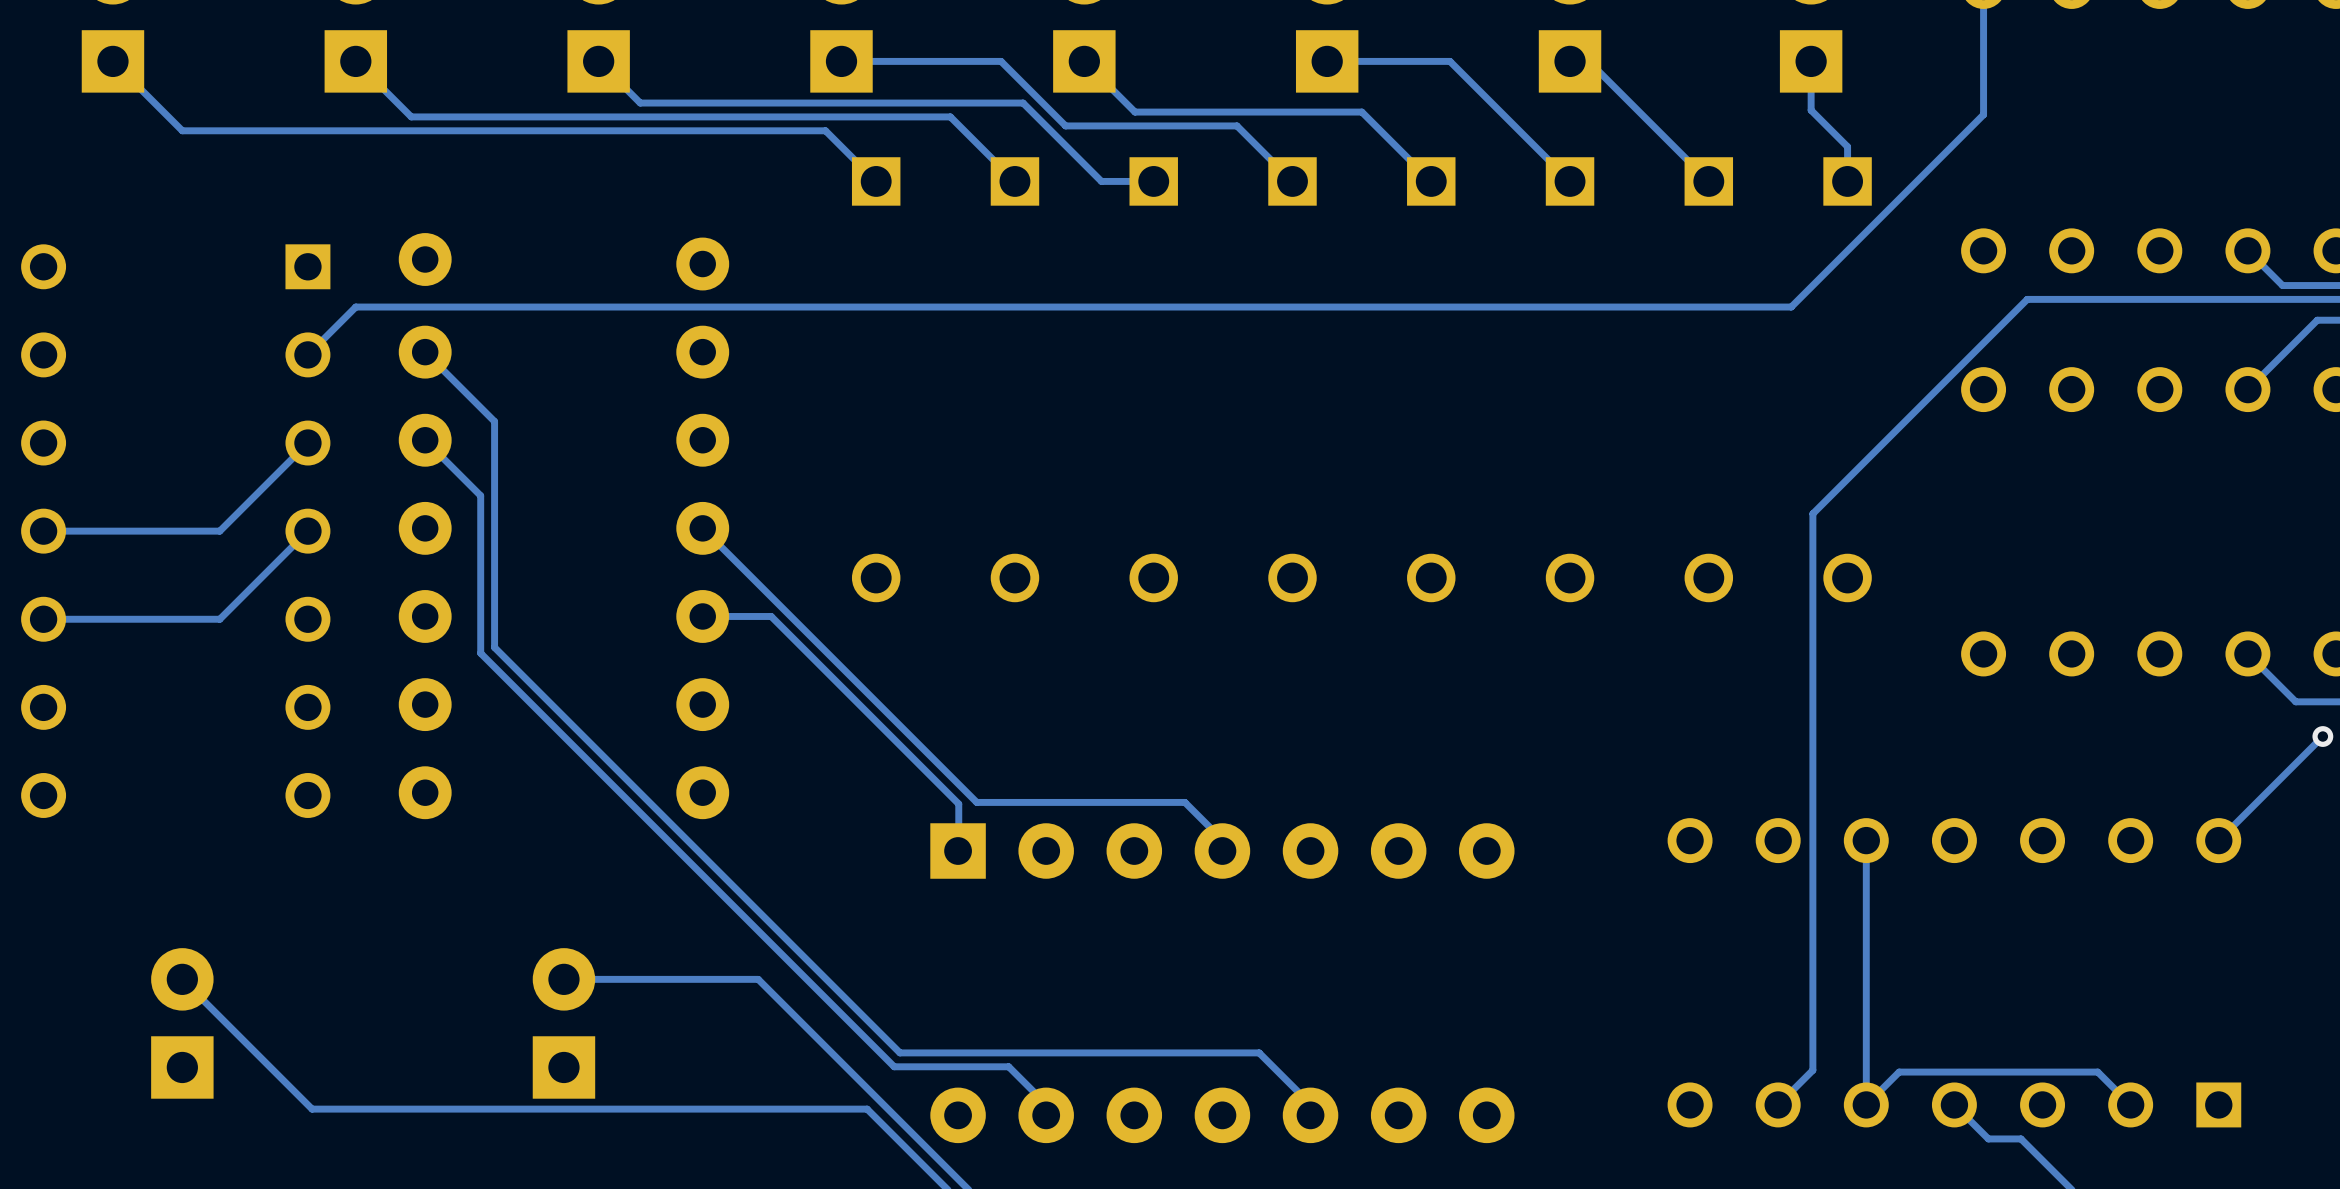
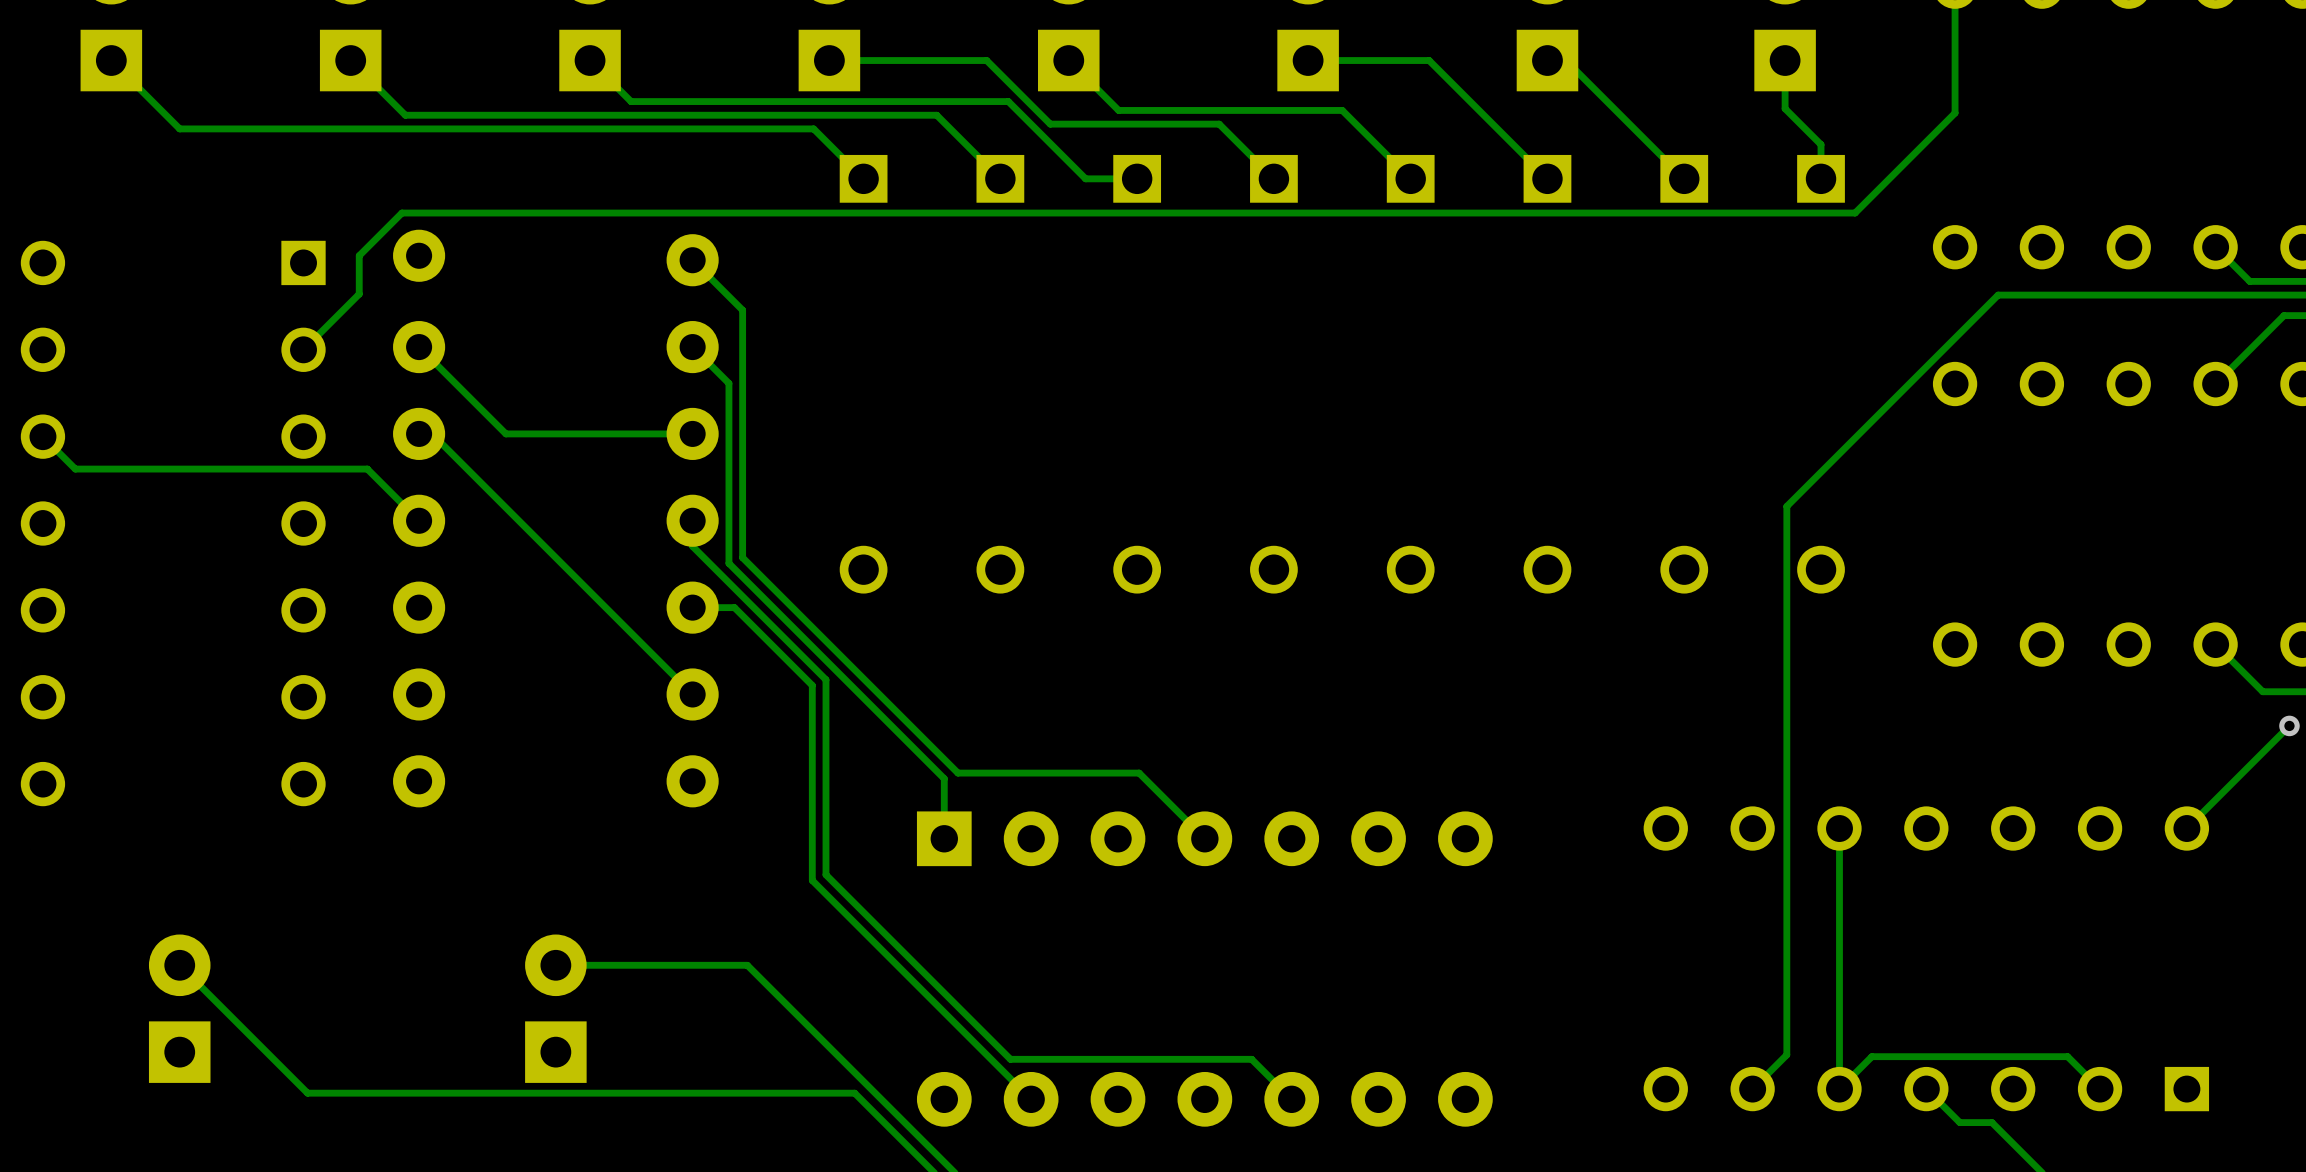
track: (1882, 216) (1791, 307) (355, 307) -> (1855, 213) (401, 213) (359, 255) (359, 294) (350, 302)
track: none -> (692, 260) (742, 310) (742, 557) (957, 773) (1139, 773) (1204, 838)
track: none -> (692, 347) (728, 383) (728, 563) (944, 778) (944, 838)
track: (494, 421) (494, 647) (899, 1052) (1259, 1052) (1311, 1104) -> (487, 415) (505, 433) (692, 433)
track: (425, 440) (480, 495) (480, 653) (894, 1066) (1008, 1066) (1046, 1104) -> (419, 433) (432, 433) (692, 694)
track: none -> (42, 436) (75, 469) (367, 469) (419, 520)
track: (307, 443) (219, 531) (43, 531) -> none
track: (702, 528) (976, 802) (1184, 802) (1223, 840) -> (692, 520) (692, 546) (825, 679) (825, 874) (1010, 1059) (1251, 1059) (1291, 1099)
track: (307, 531) (219, 619) (43, 619) -> none
track: (745, 616) (771, 616) (958, 804) (958, 840) -> (734, 607) (812, 685) (812, 880) (1031, 1099)

